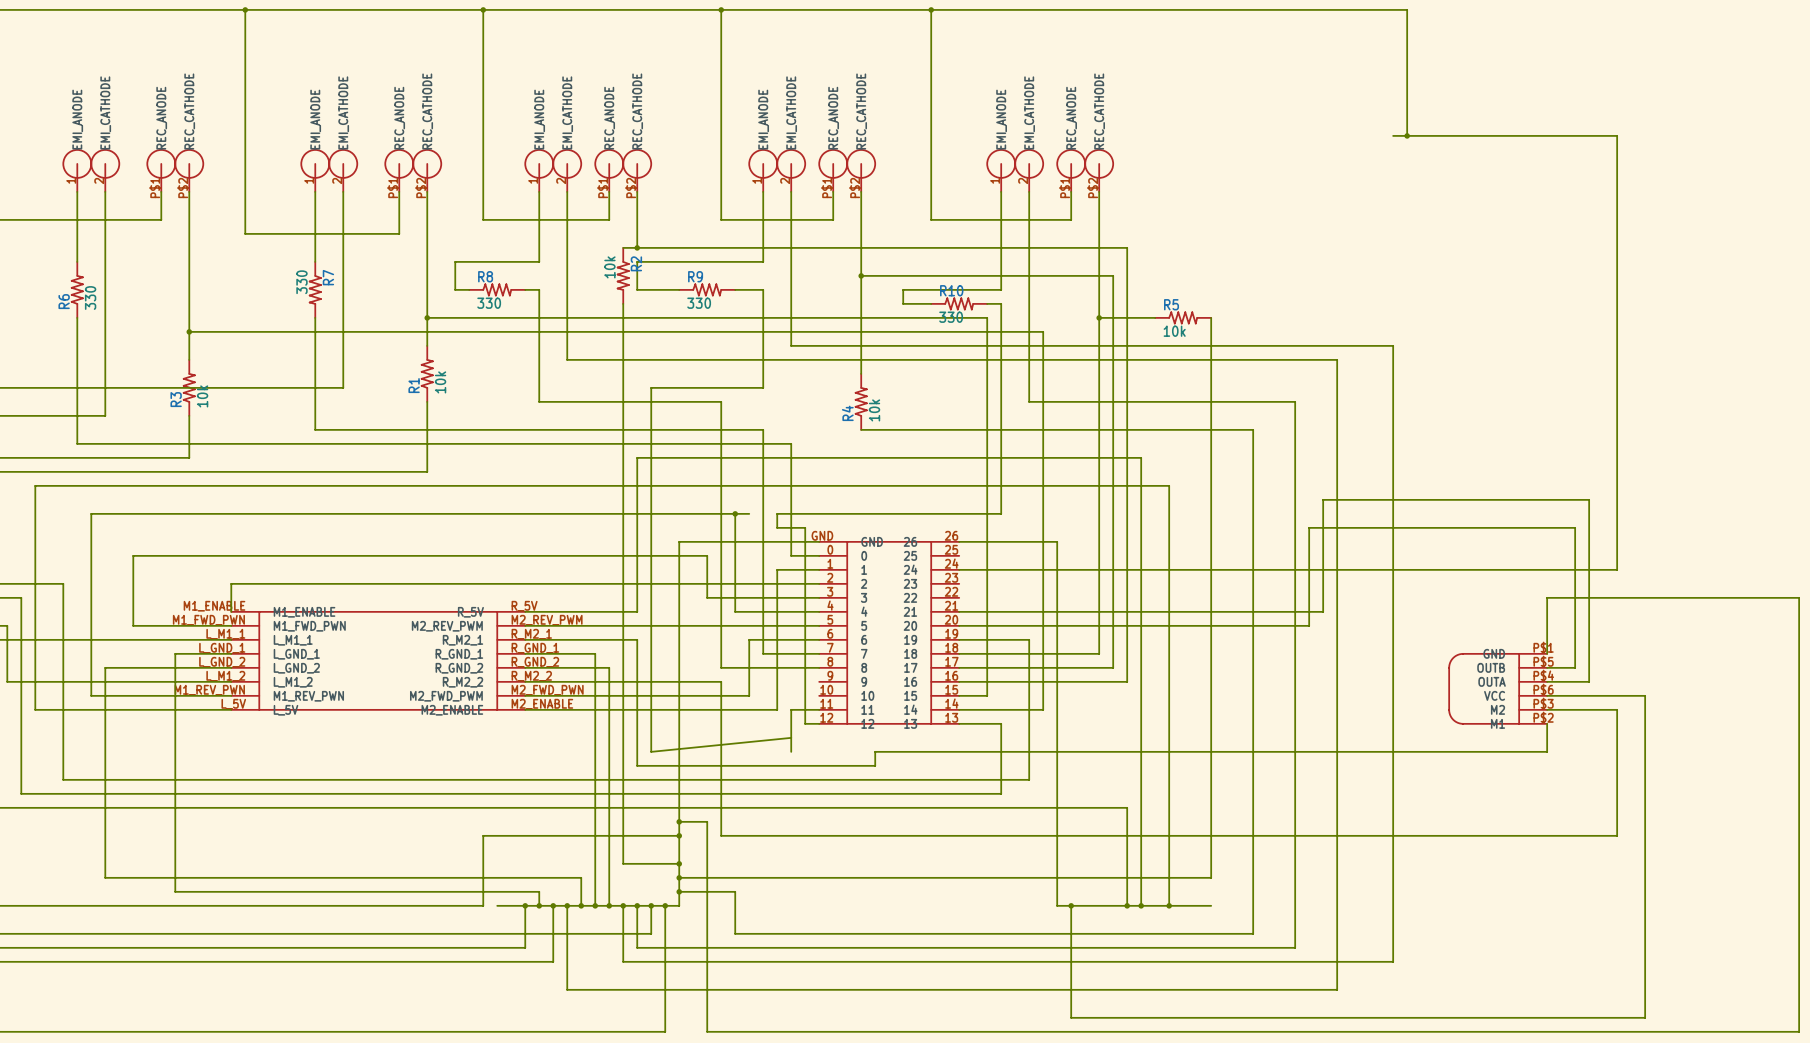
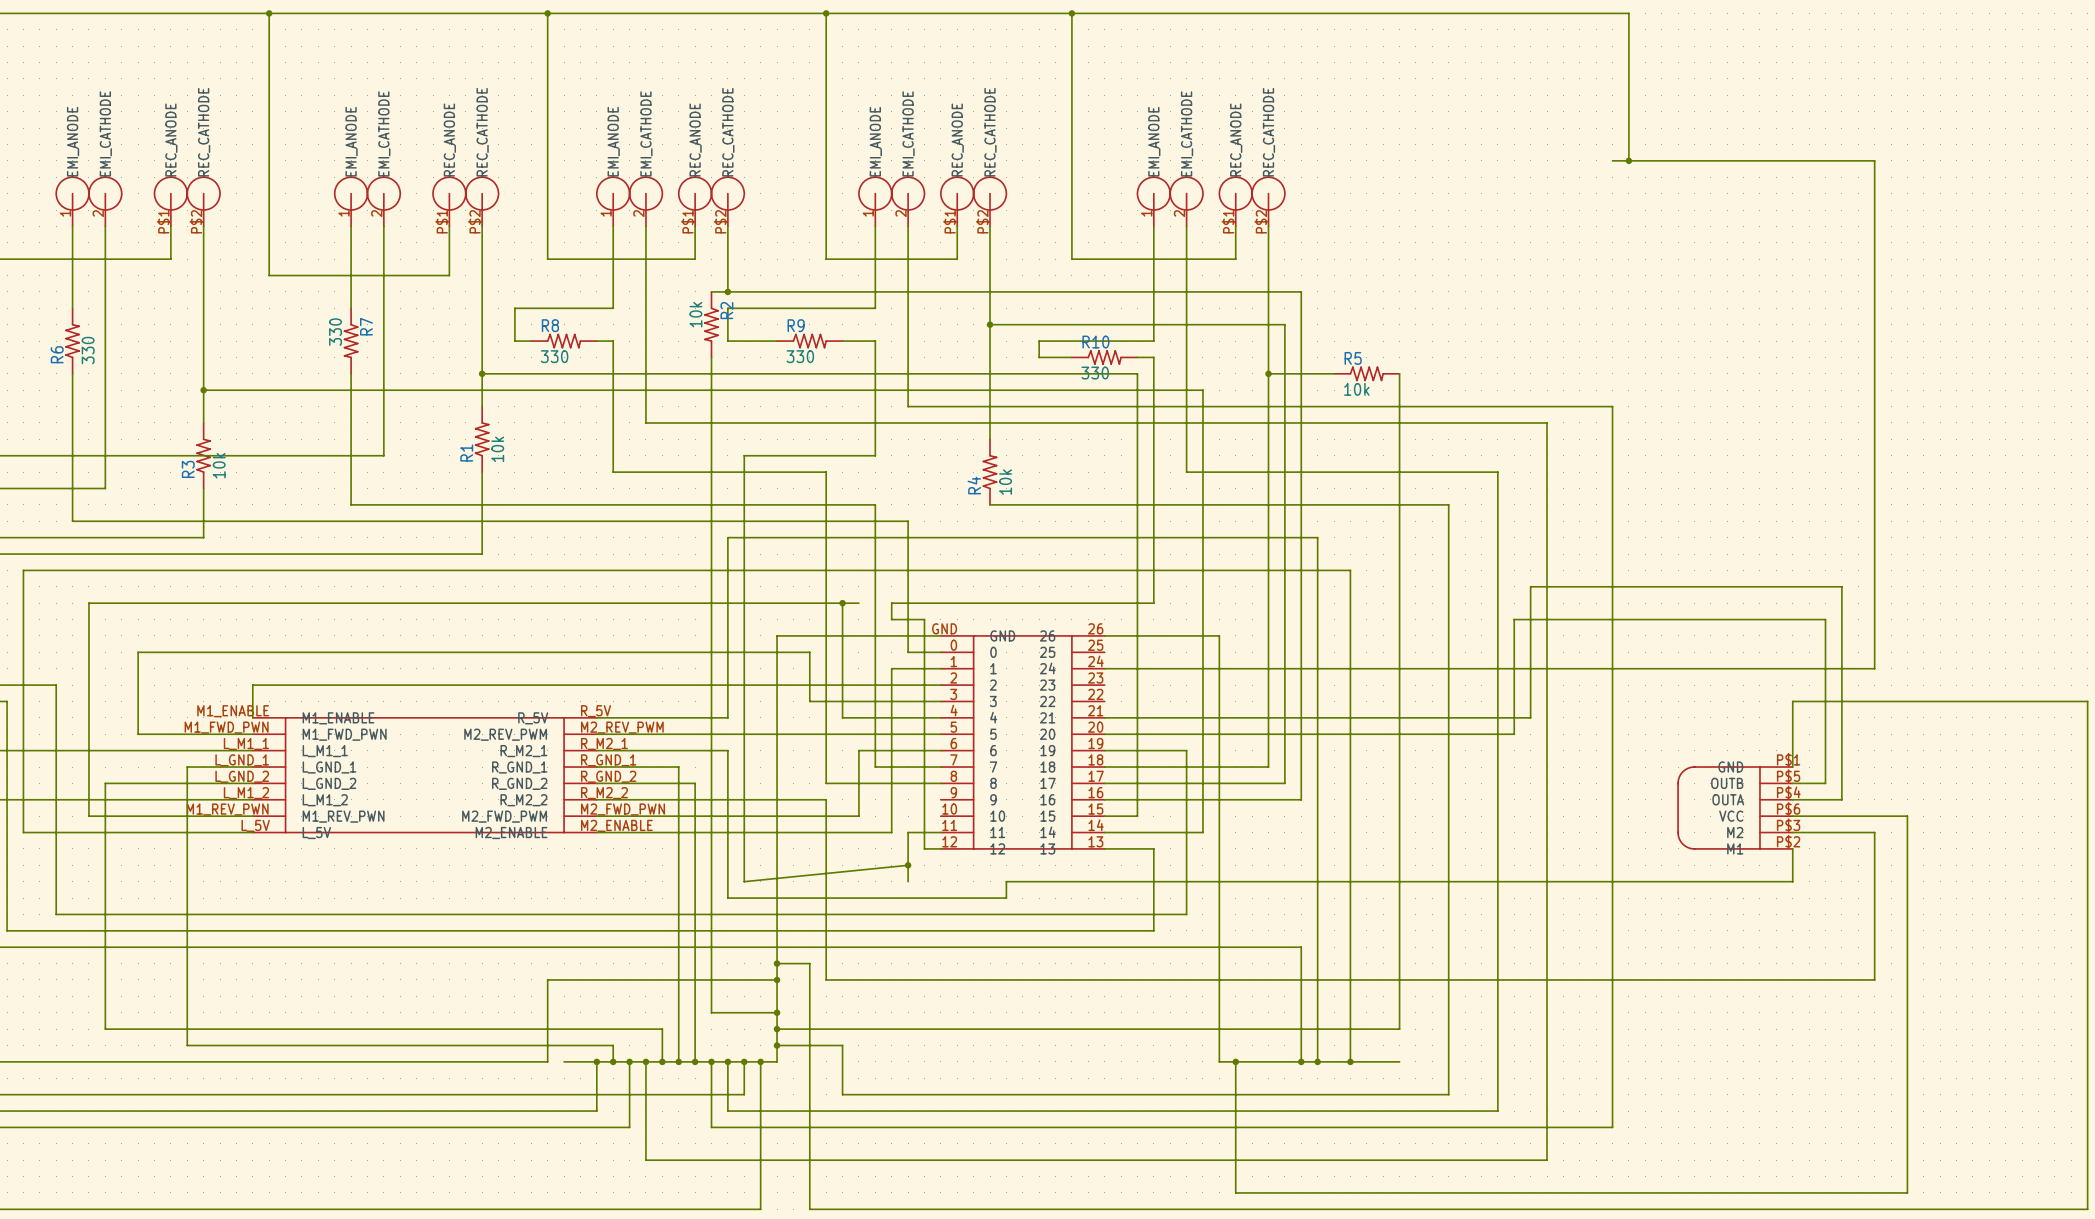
junction: none -> (908, 865)

